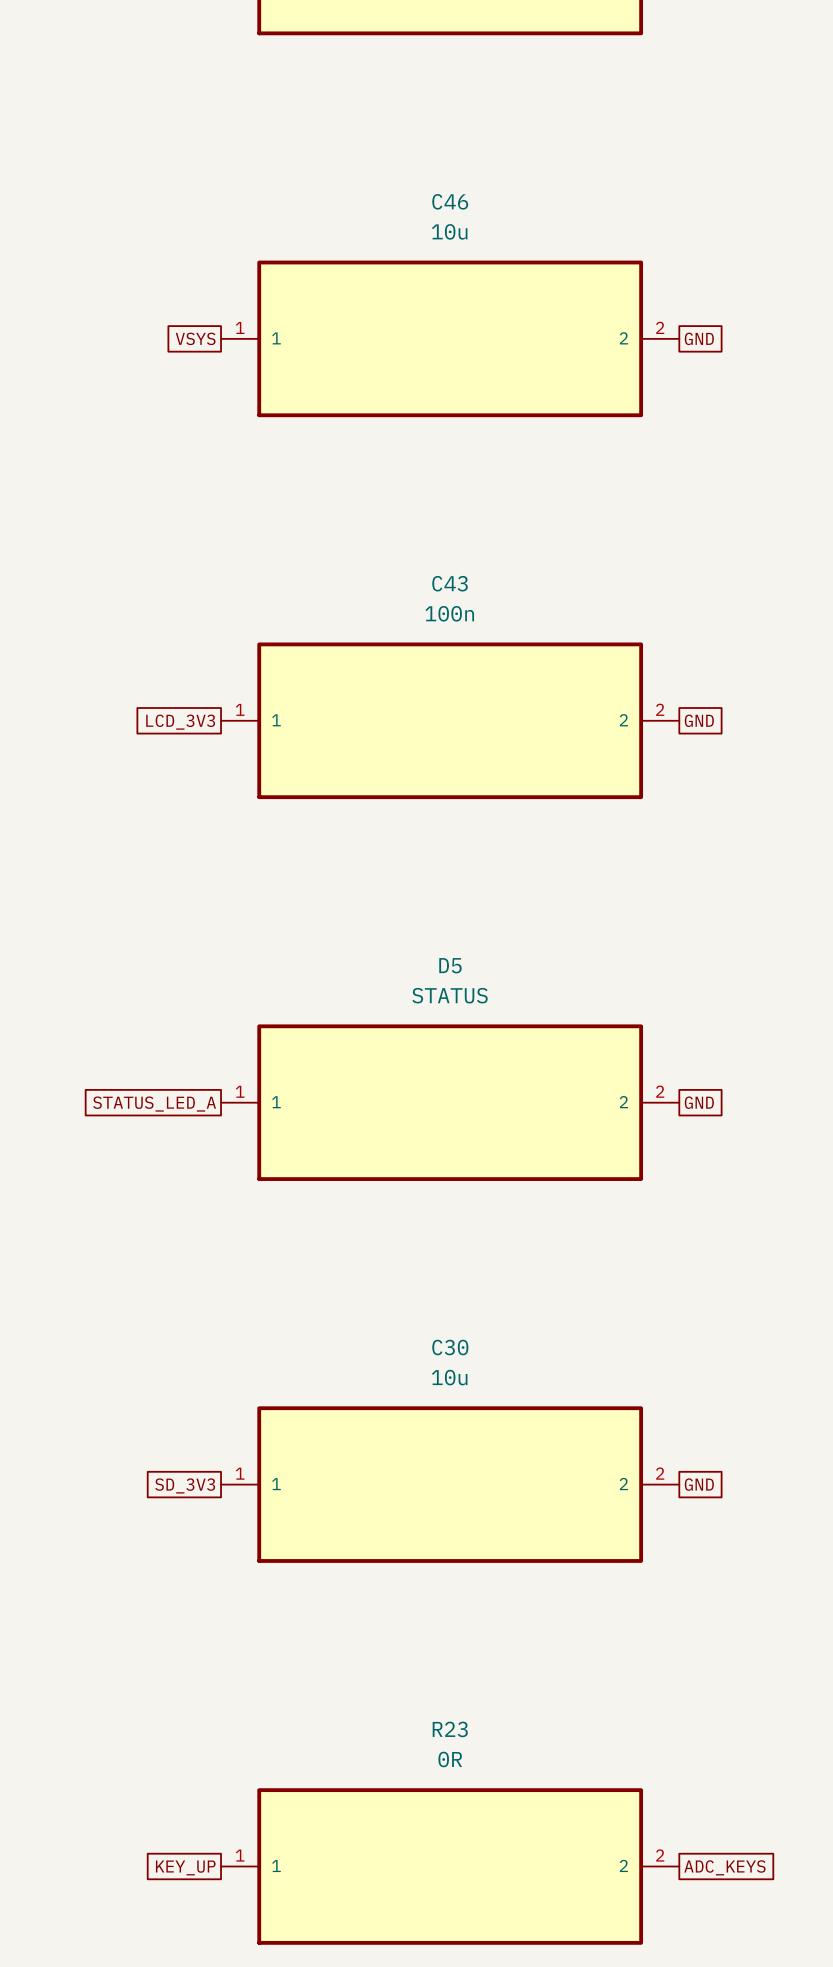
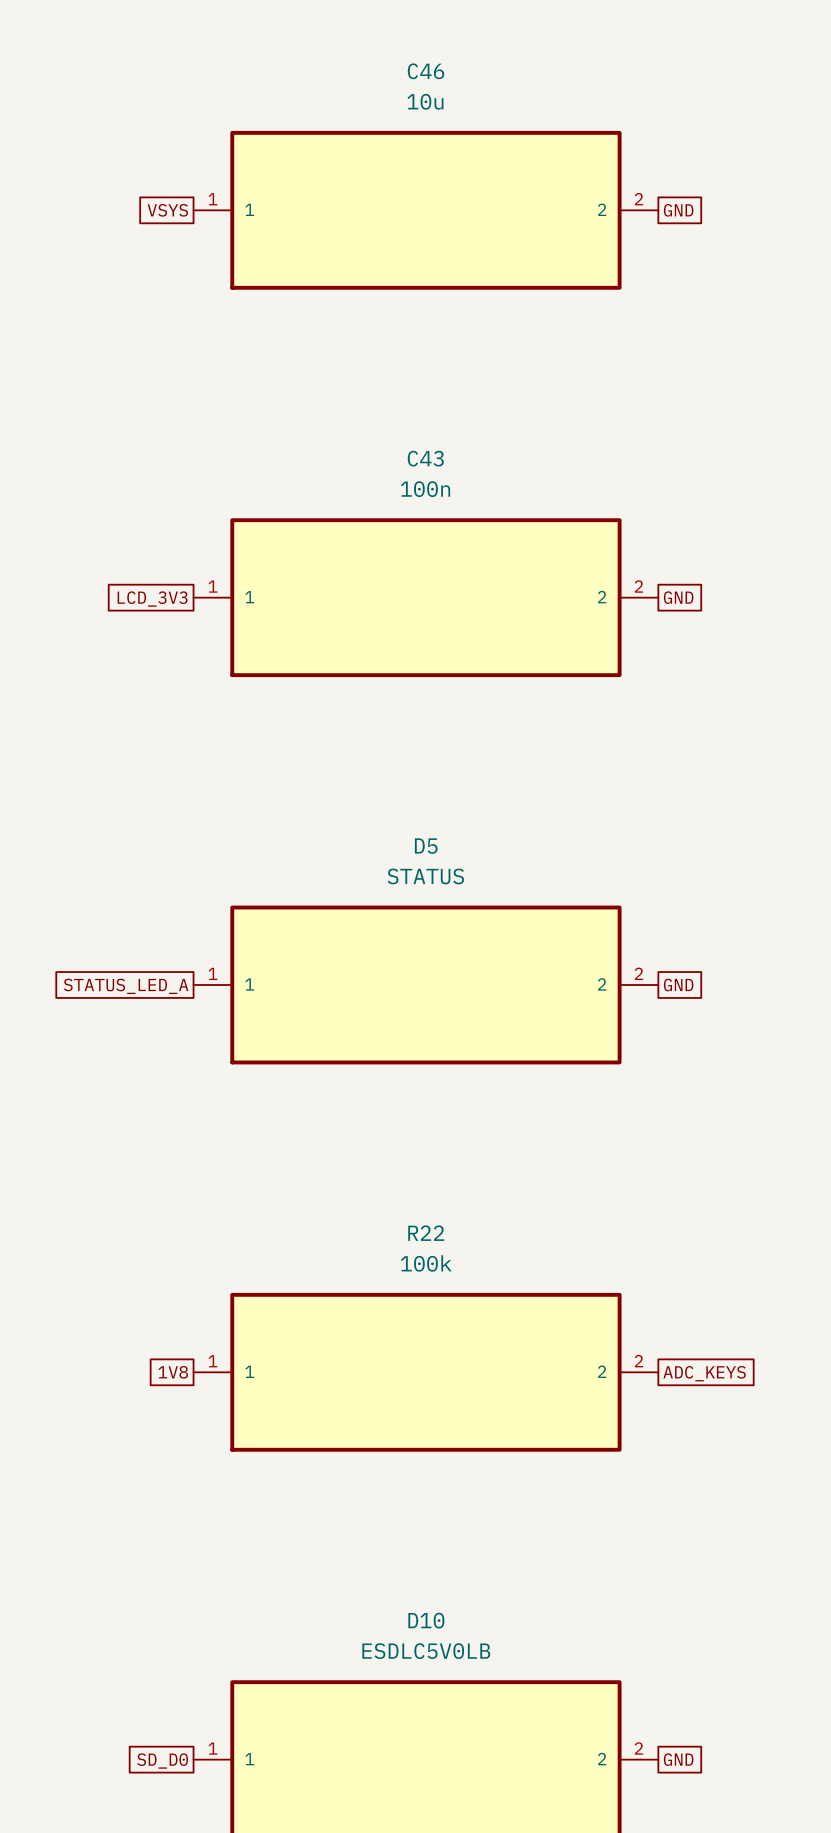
C30 name: C30 (450, 1347) -> R22 (426, 1233)
C30 value: 10u (449, 1377) -> 100k (426, 1263)
global label: GND (699, 1484) -> ADC_KEYS (704, 1373)
global label: SD_3V3 (185, 1485) -> 1V8 (173, 1372)
R23 name: R23 (450, 1729) -> D10 (426, 1620)
R23 value: 0R (450, 1759) -> ESDLC5V0LB (426, 1651)
global label: KEY_UP (185, 1867) -> SD_D0 (162, 1761)
global label: ADC_KEYS (724, 1867) -> GND (678, 1759)

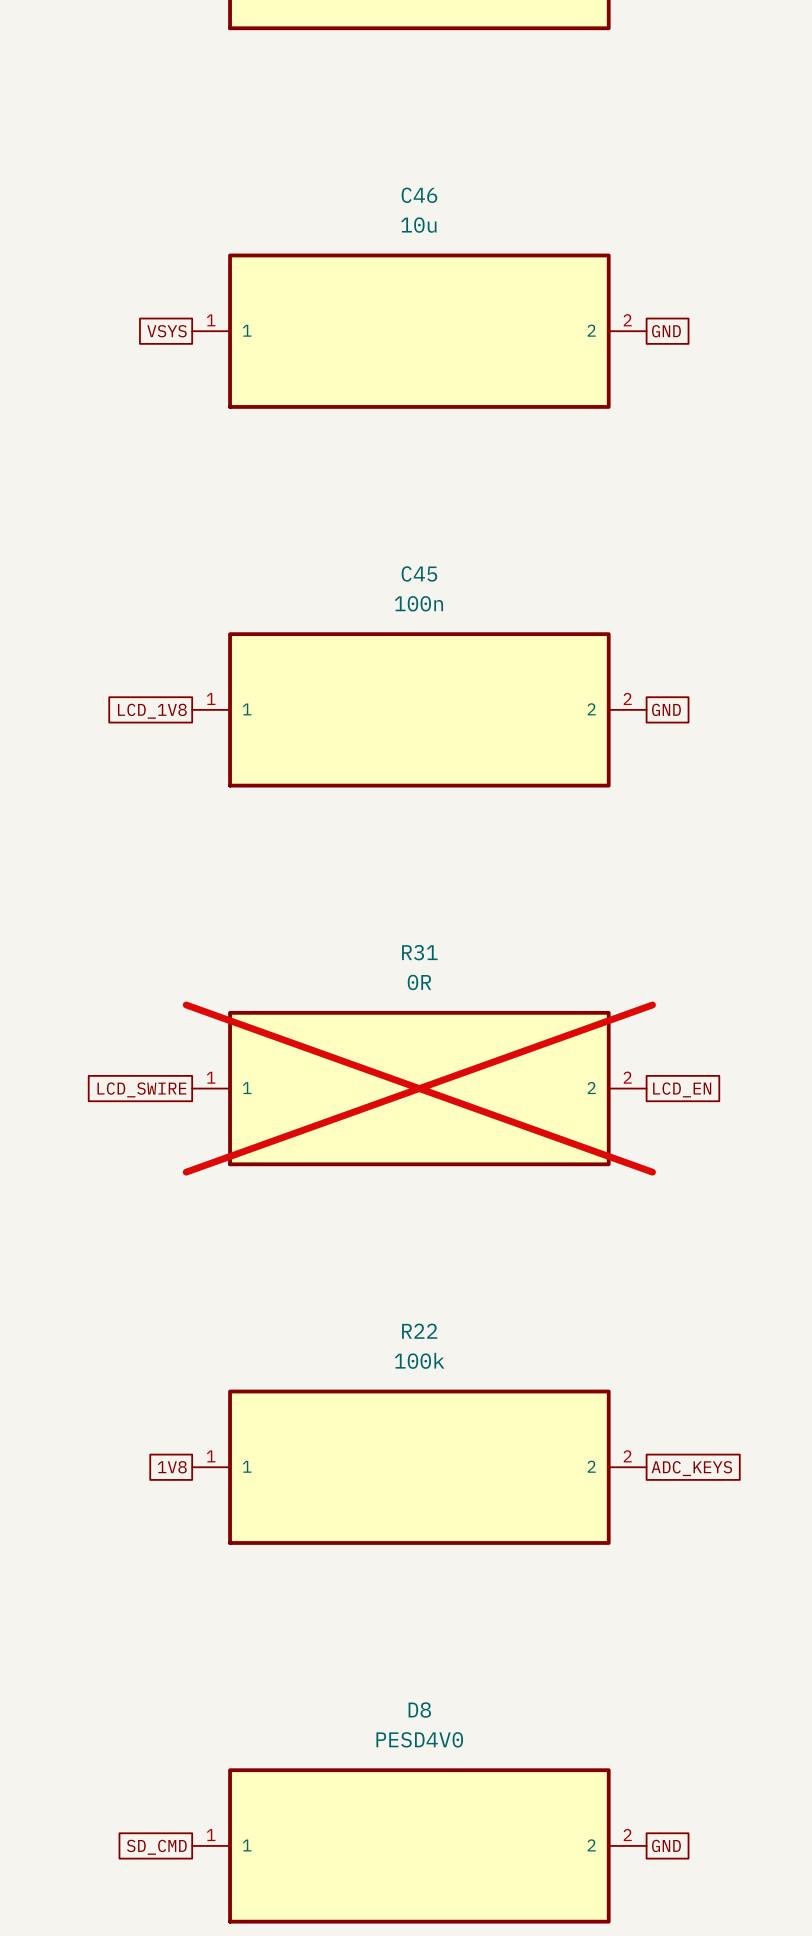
C43 name: C43 (425, 458) -> C45 (419, 573)
global label: LCD_3V3 (152, 599) -> LCD_1V8 (152, 711)
D5 name: D5 (426, 846) -> R31 (419, 952)
D5 value: STATUS (425, 876) -> 0R (419, 982)
D5 do-not-place cross: none -> (419, 1088)
global label: GND (678, 984) -> LCD_EN (682, 1089)
global label: STATUS_LED_A (126, 986) -> LCD_SWIRE (141, 1089)
D10 name: D10 (426, 1620) -> D8 (419, 1710)
D10 value: ESDLC5V0LB (426, 1651) -> PESD4V0 (419, 1739)
global label: SD_D0 (162, 1761) -> SD_CMD (156, 1847)

